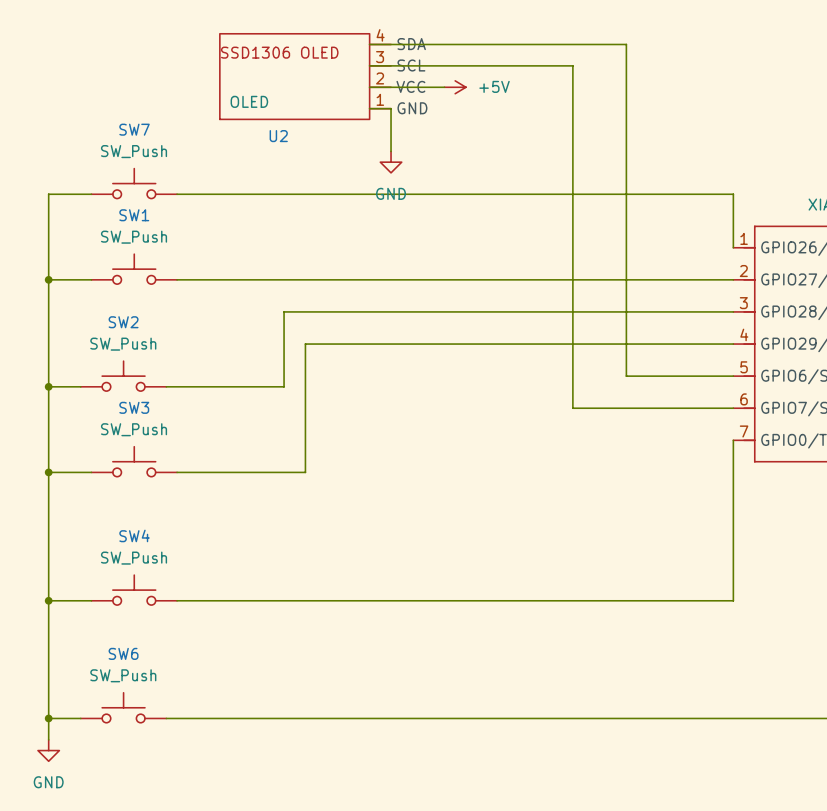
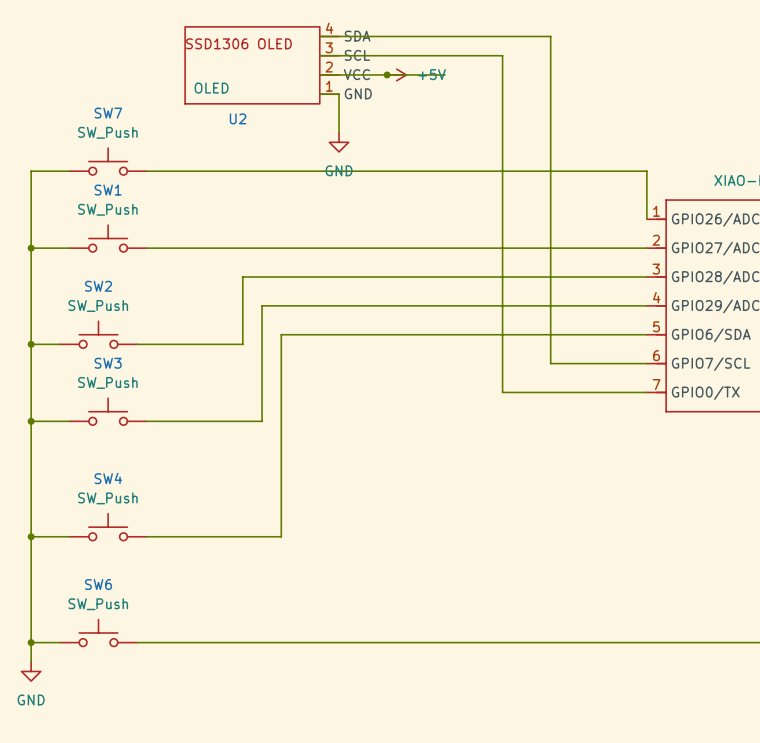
wire: none -> (387, 74) (444, 74)
junction: none -> (387, 74)
wire: (572, 408) (626, 408) -> (502, 363) (502, 392) (646, 392)
wire: (733, 440) (733, 600) (326, 600) -> (550, 363) (550, 334) (281, 334) (281, 536)

